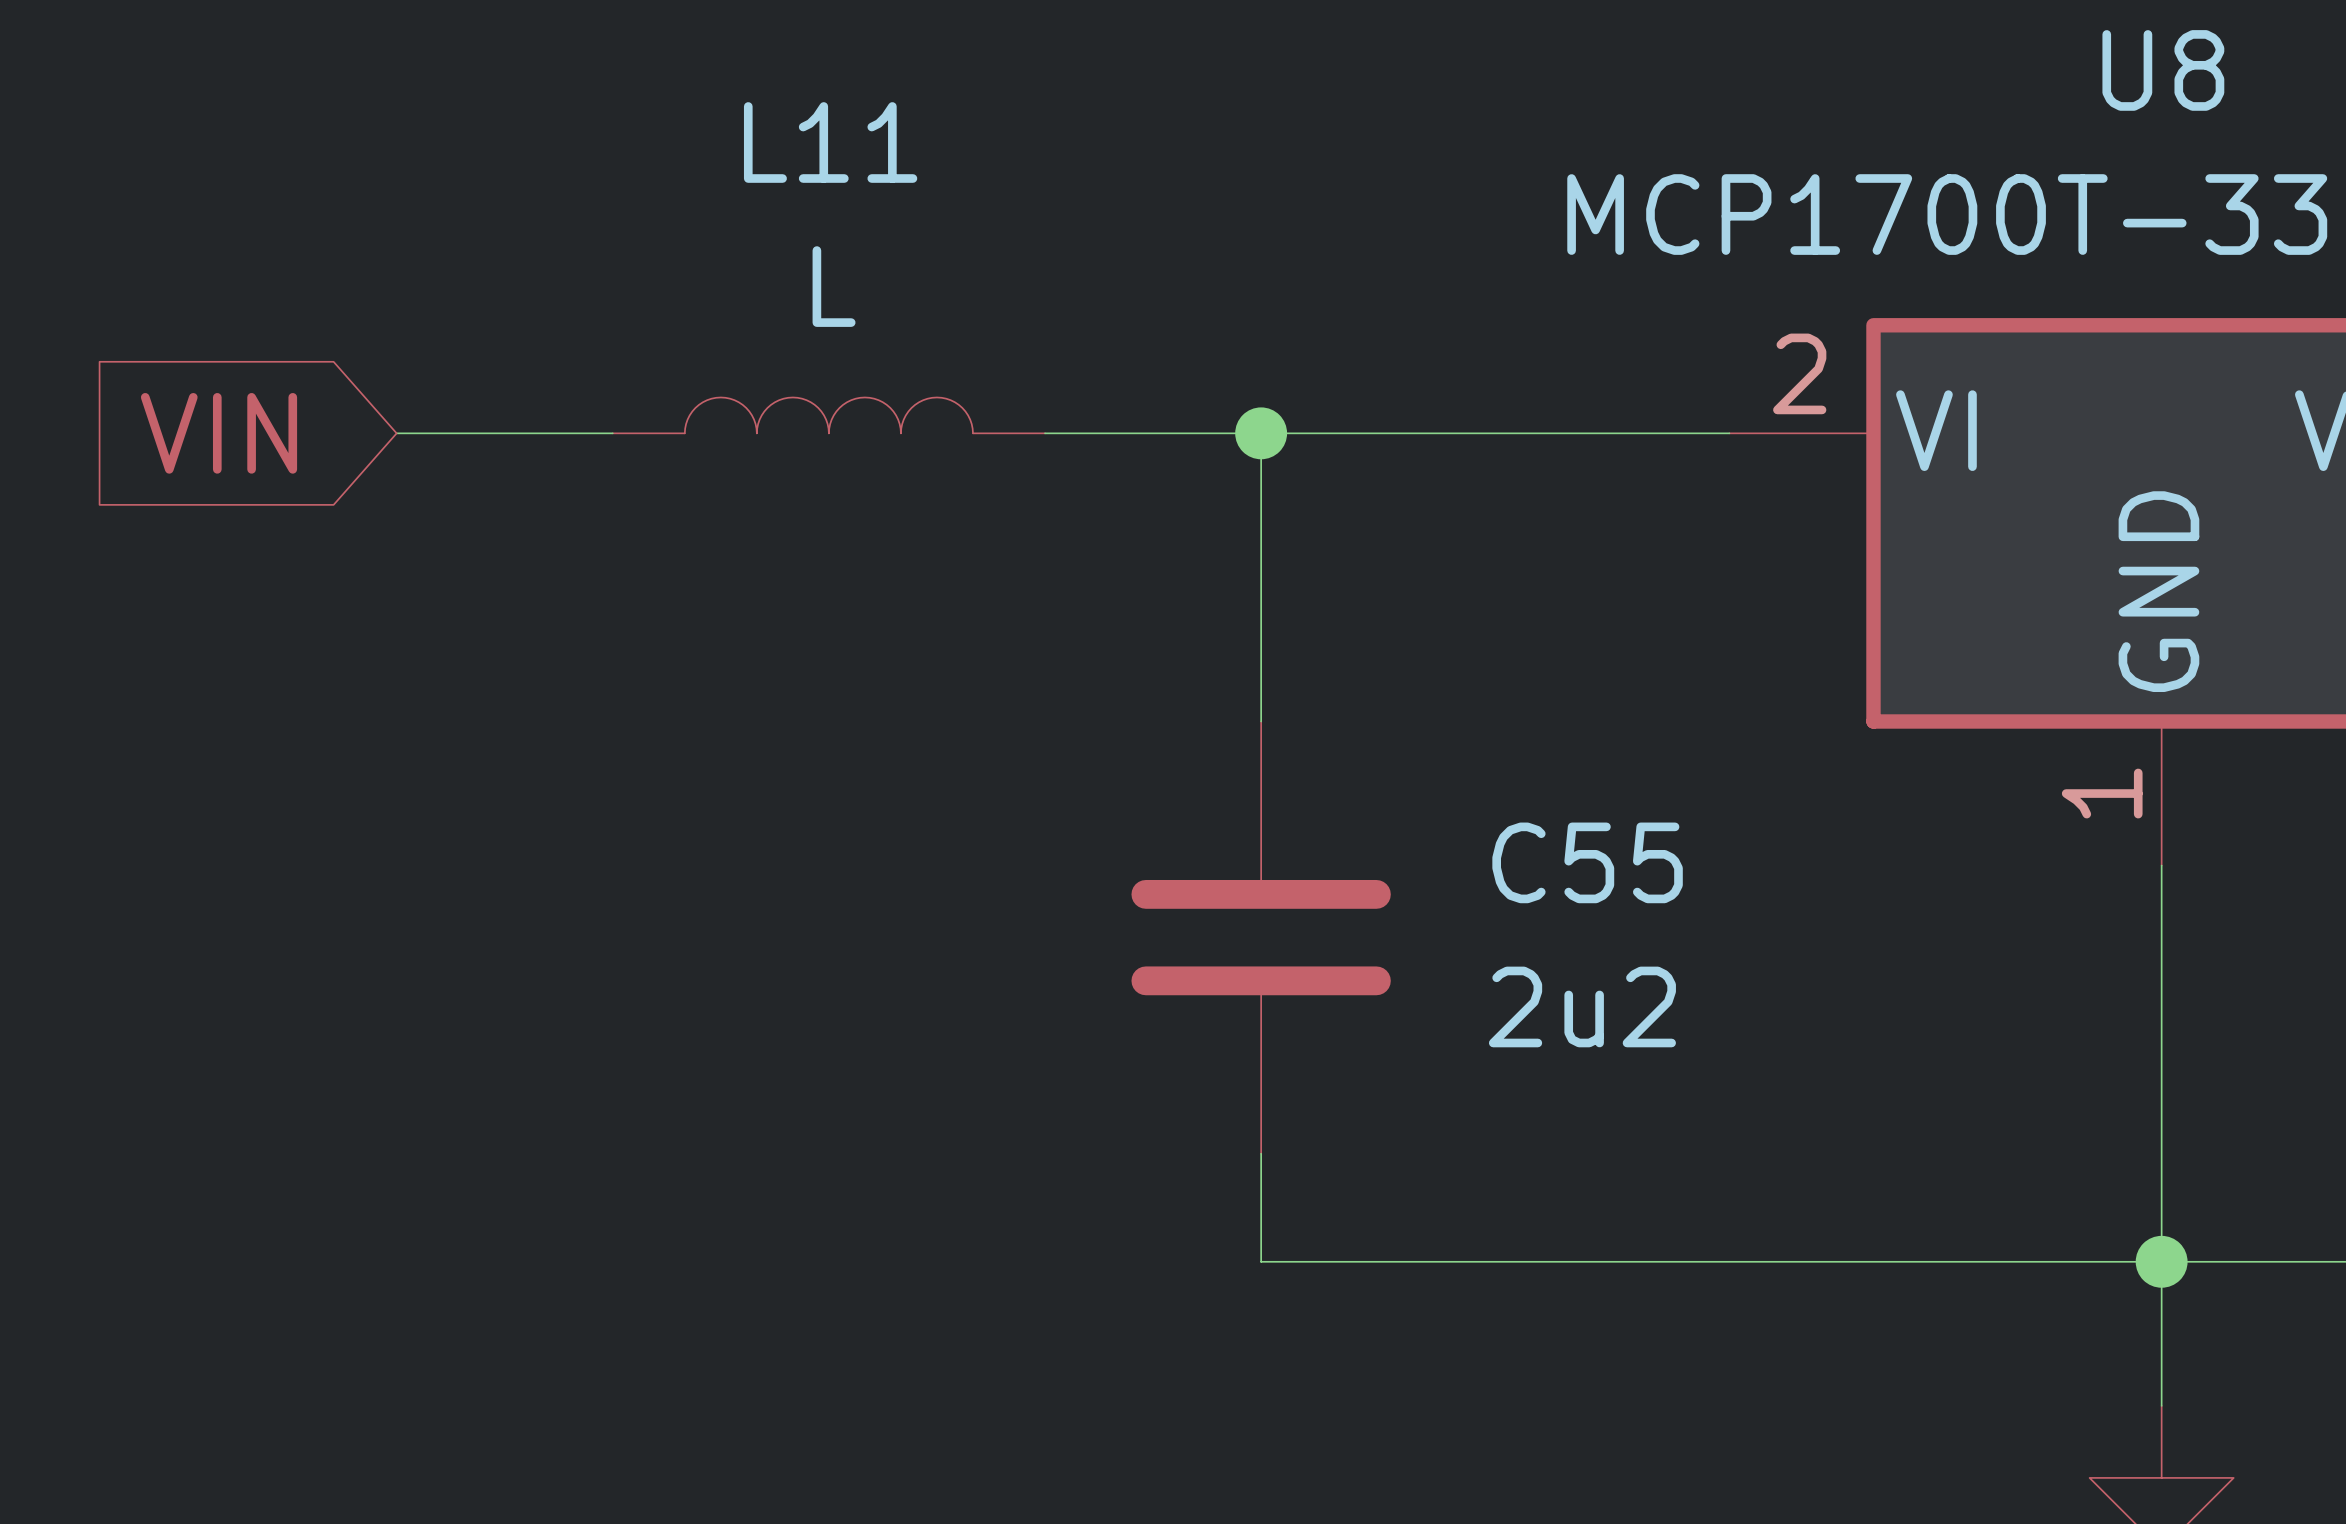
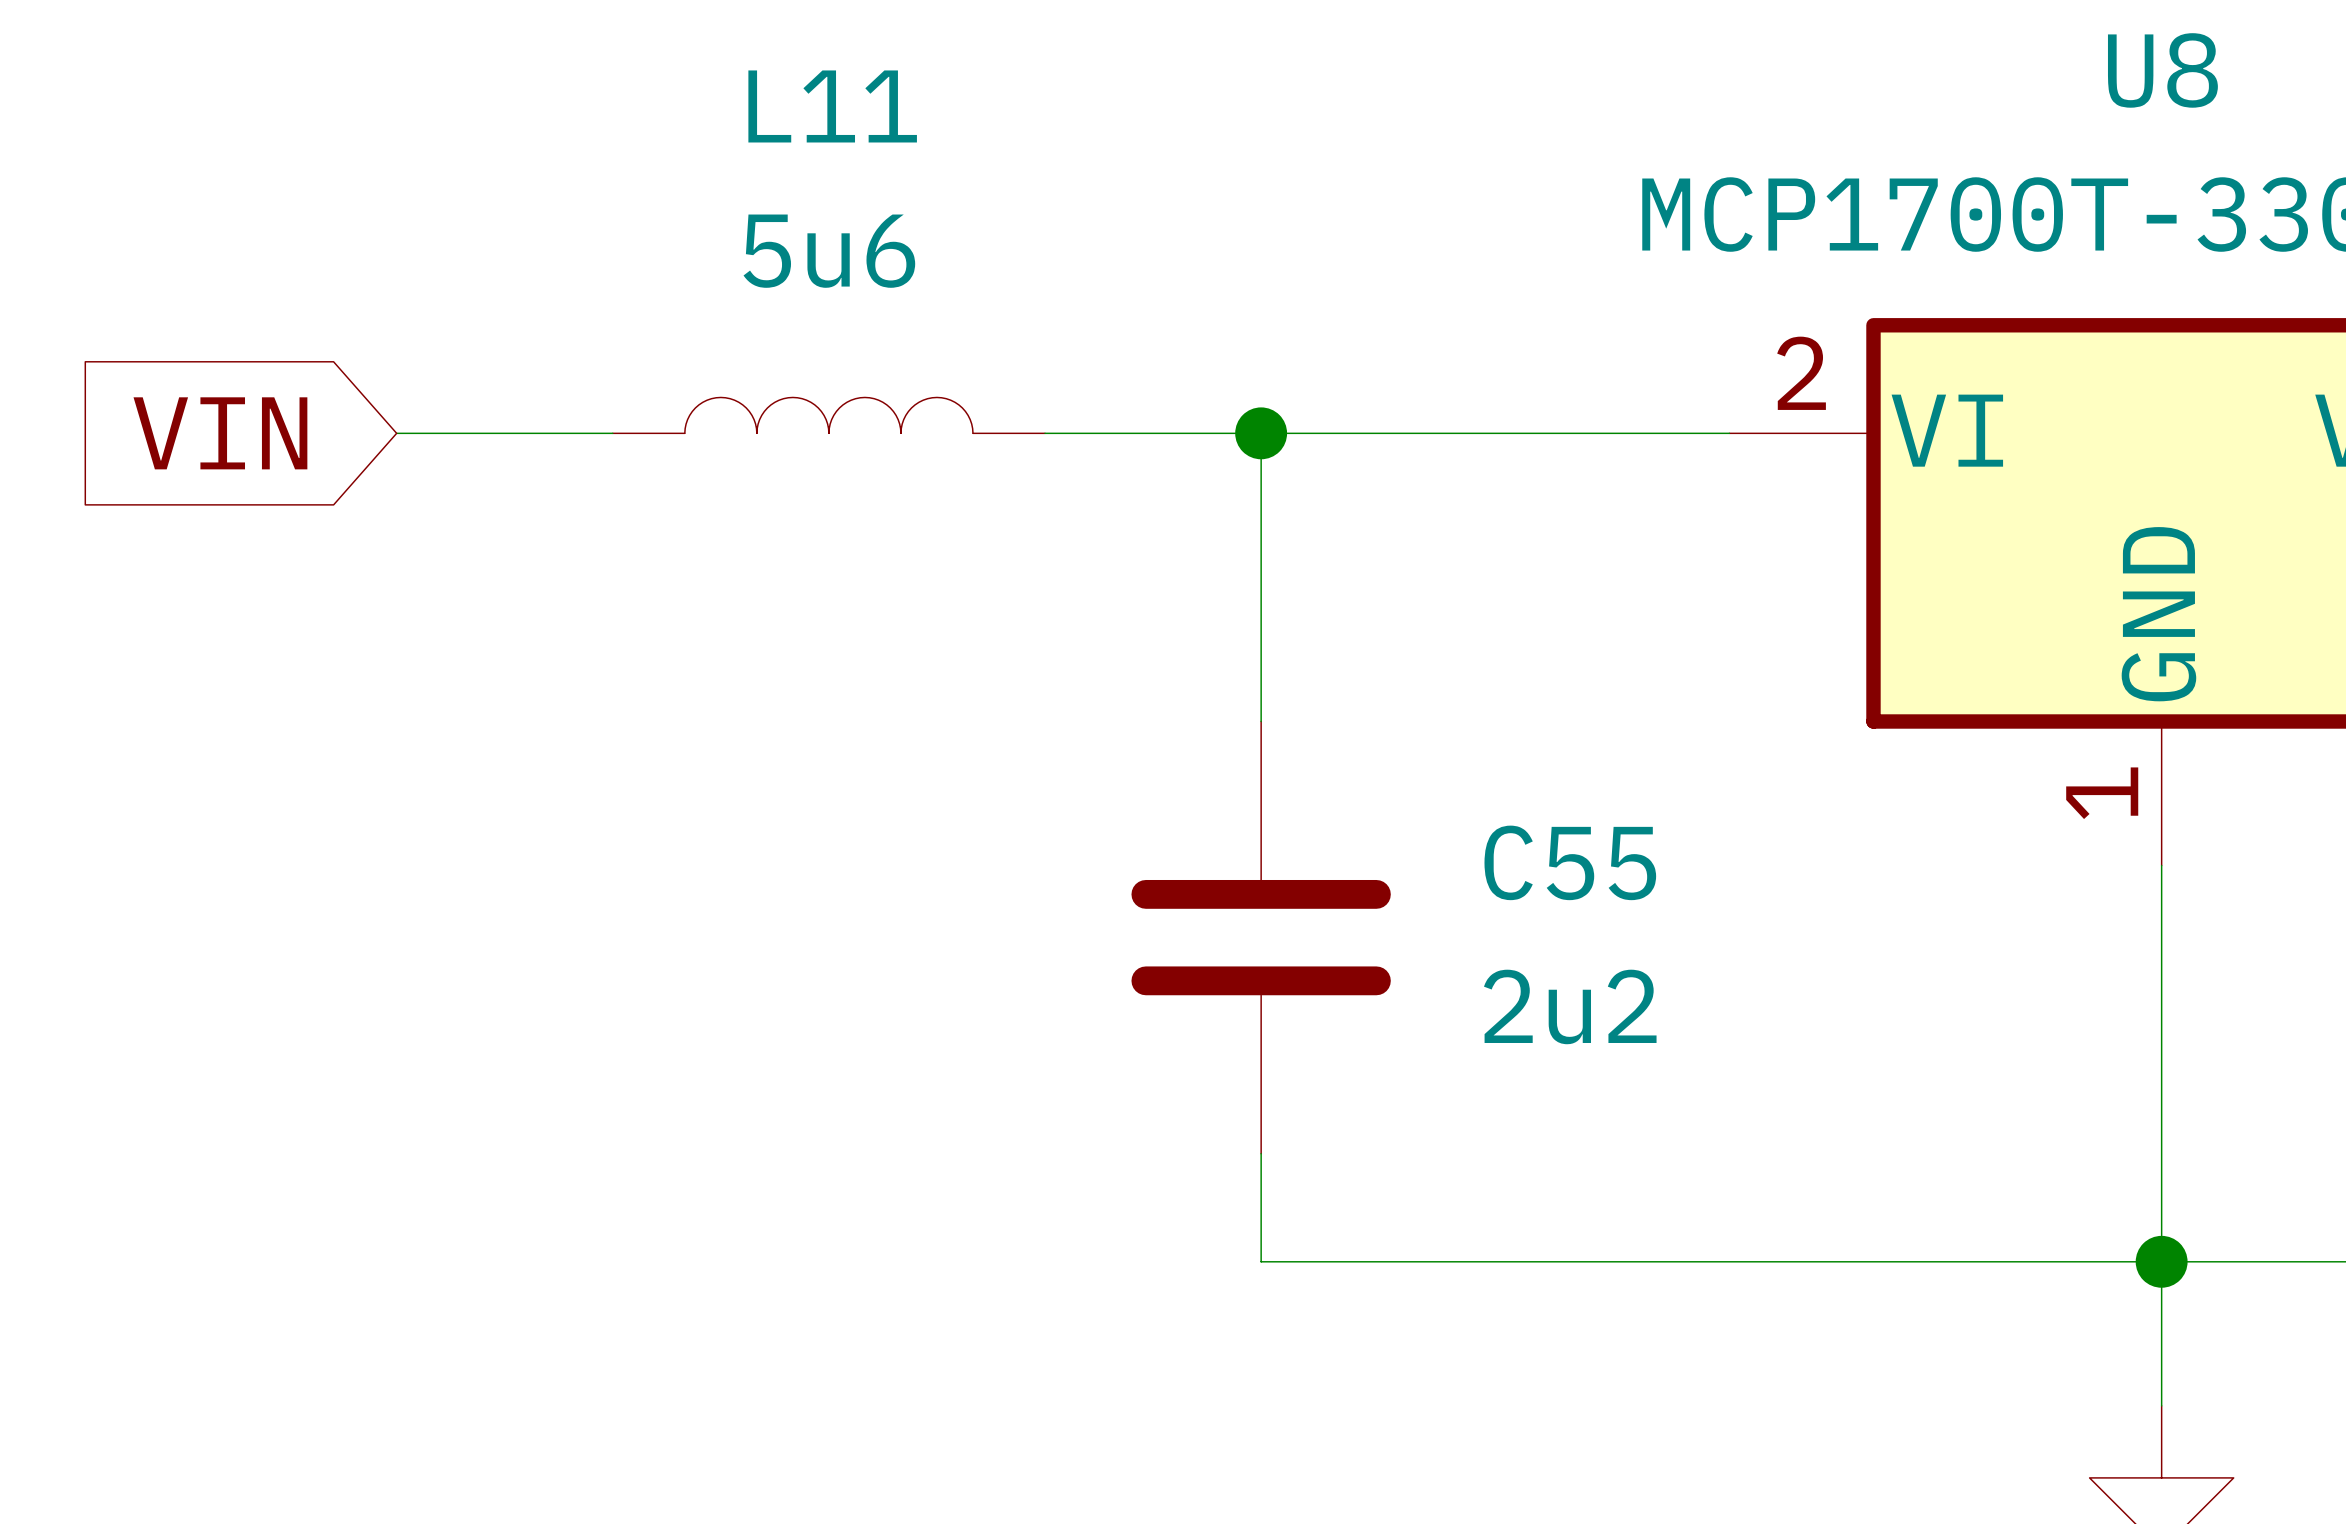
L11 name position: L11 (830, 142) -> L11 (832, 106)
L11 value: L (834, 286) -> 5u6 (829, 251)

